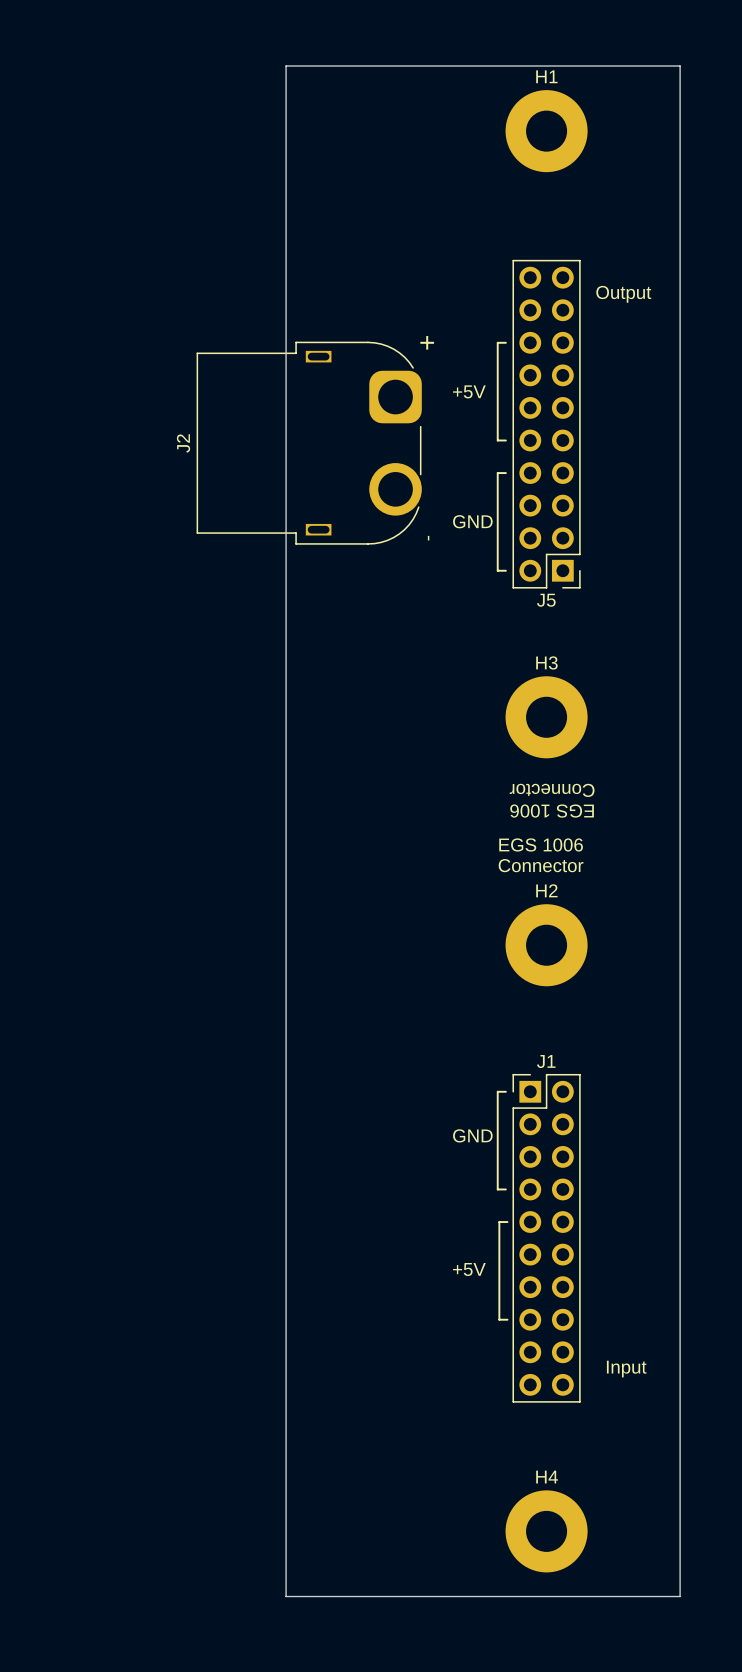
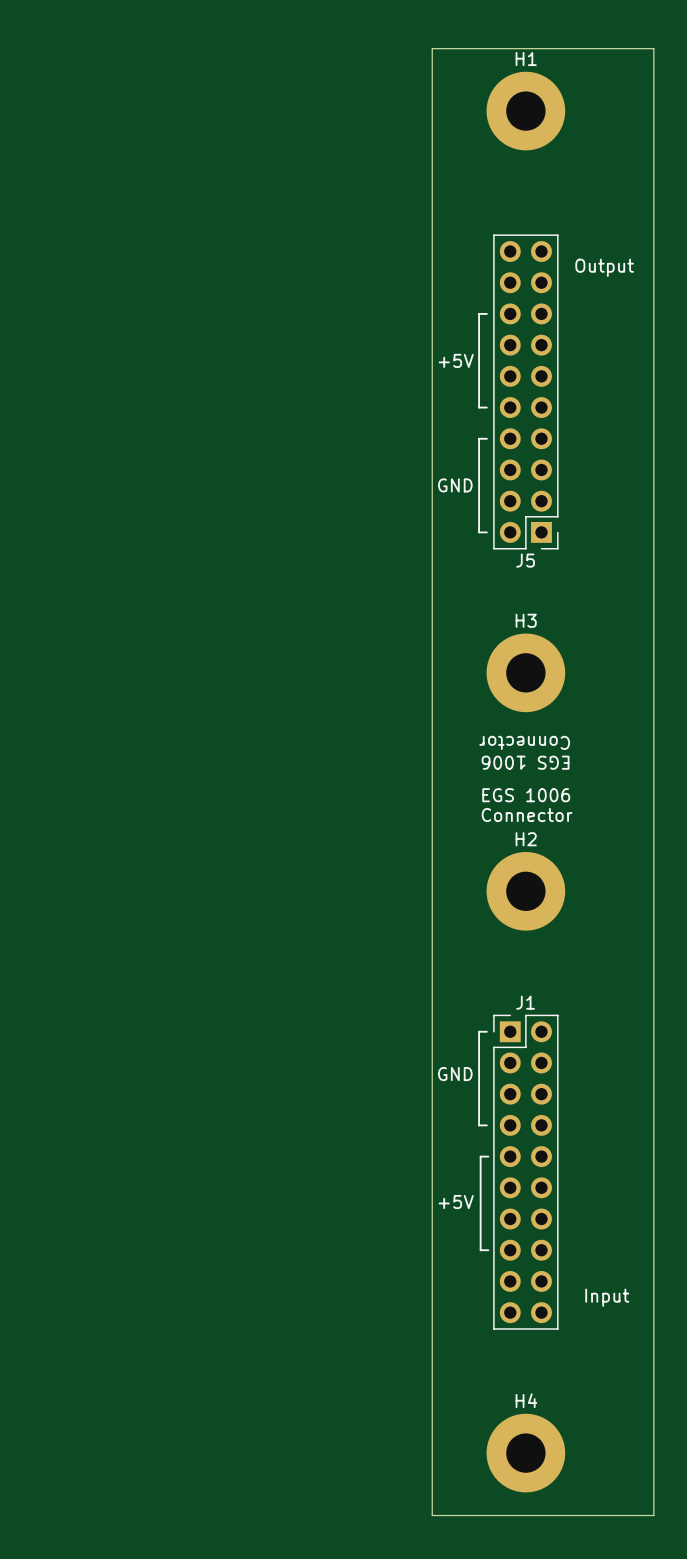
board edge: (448, 66) (286, 66) (286, 1596) (448, 1596) -> (432, 48) (432, 1515)
J2: (309, 443) -> none

